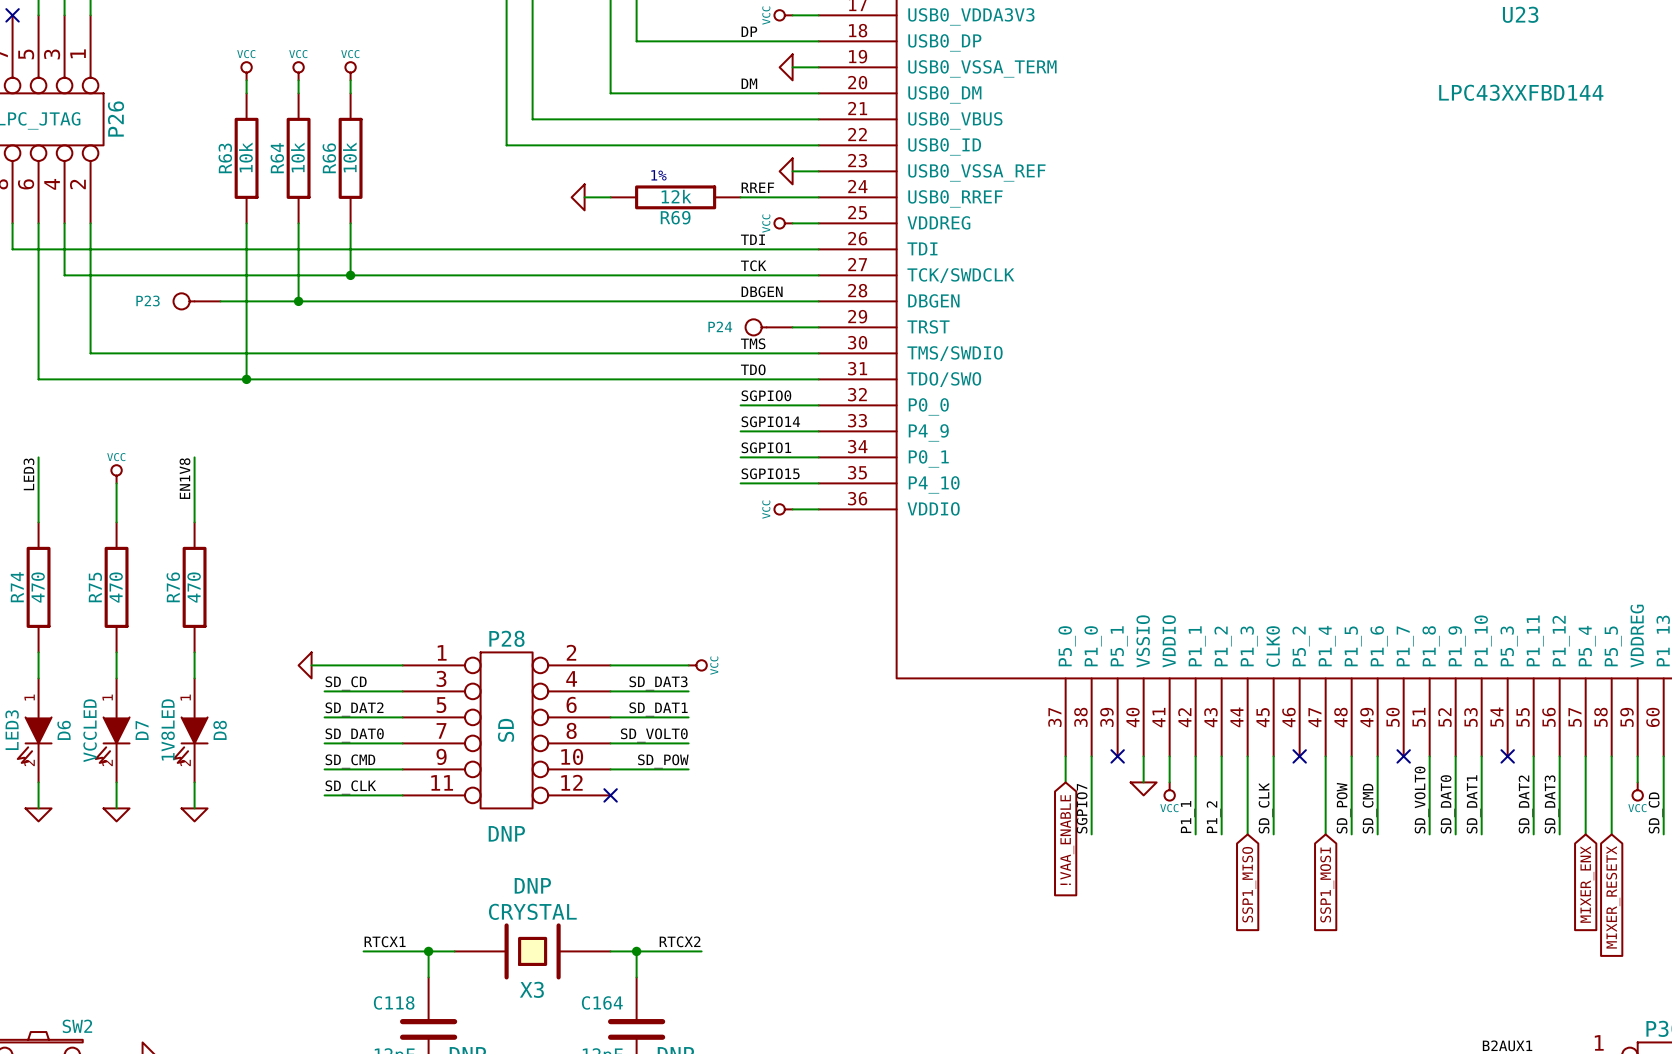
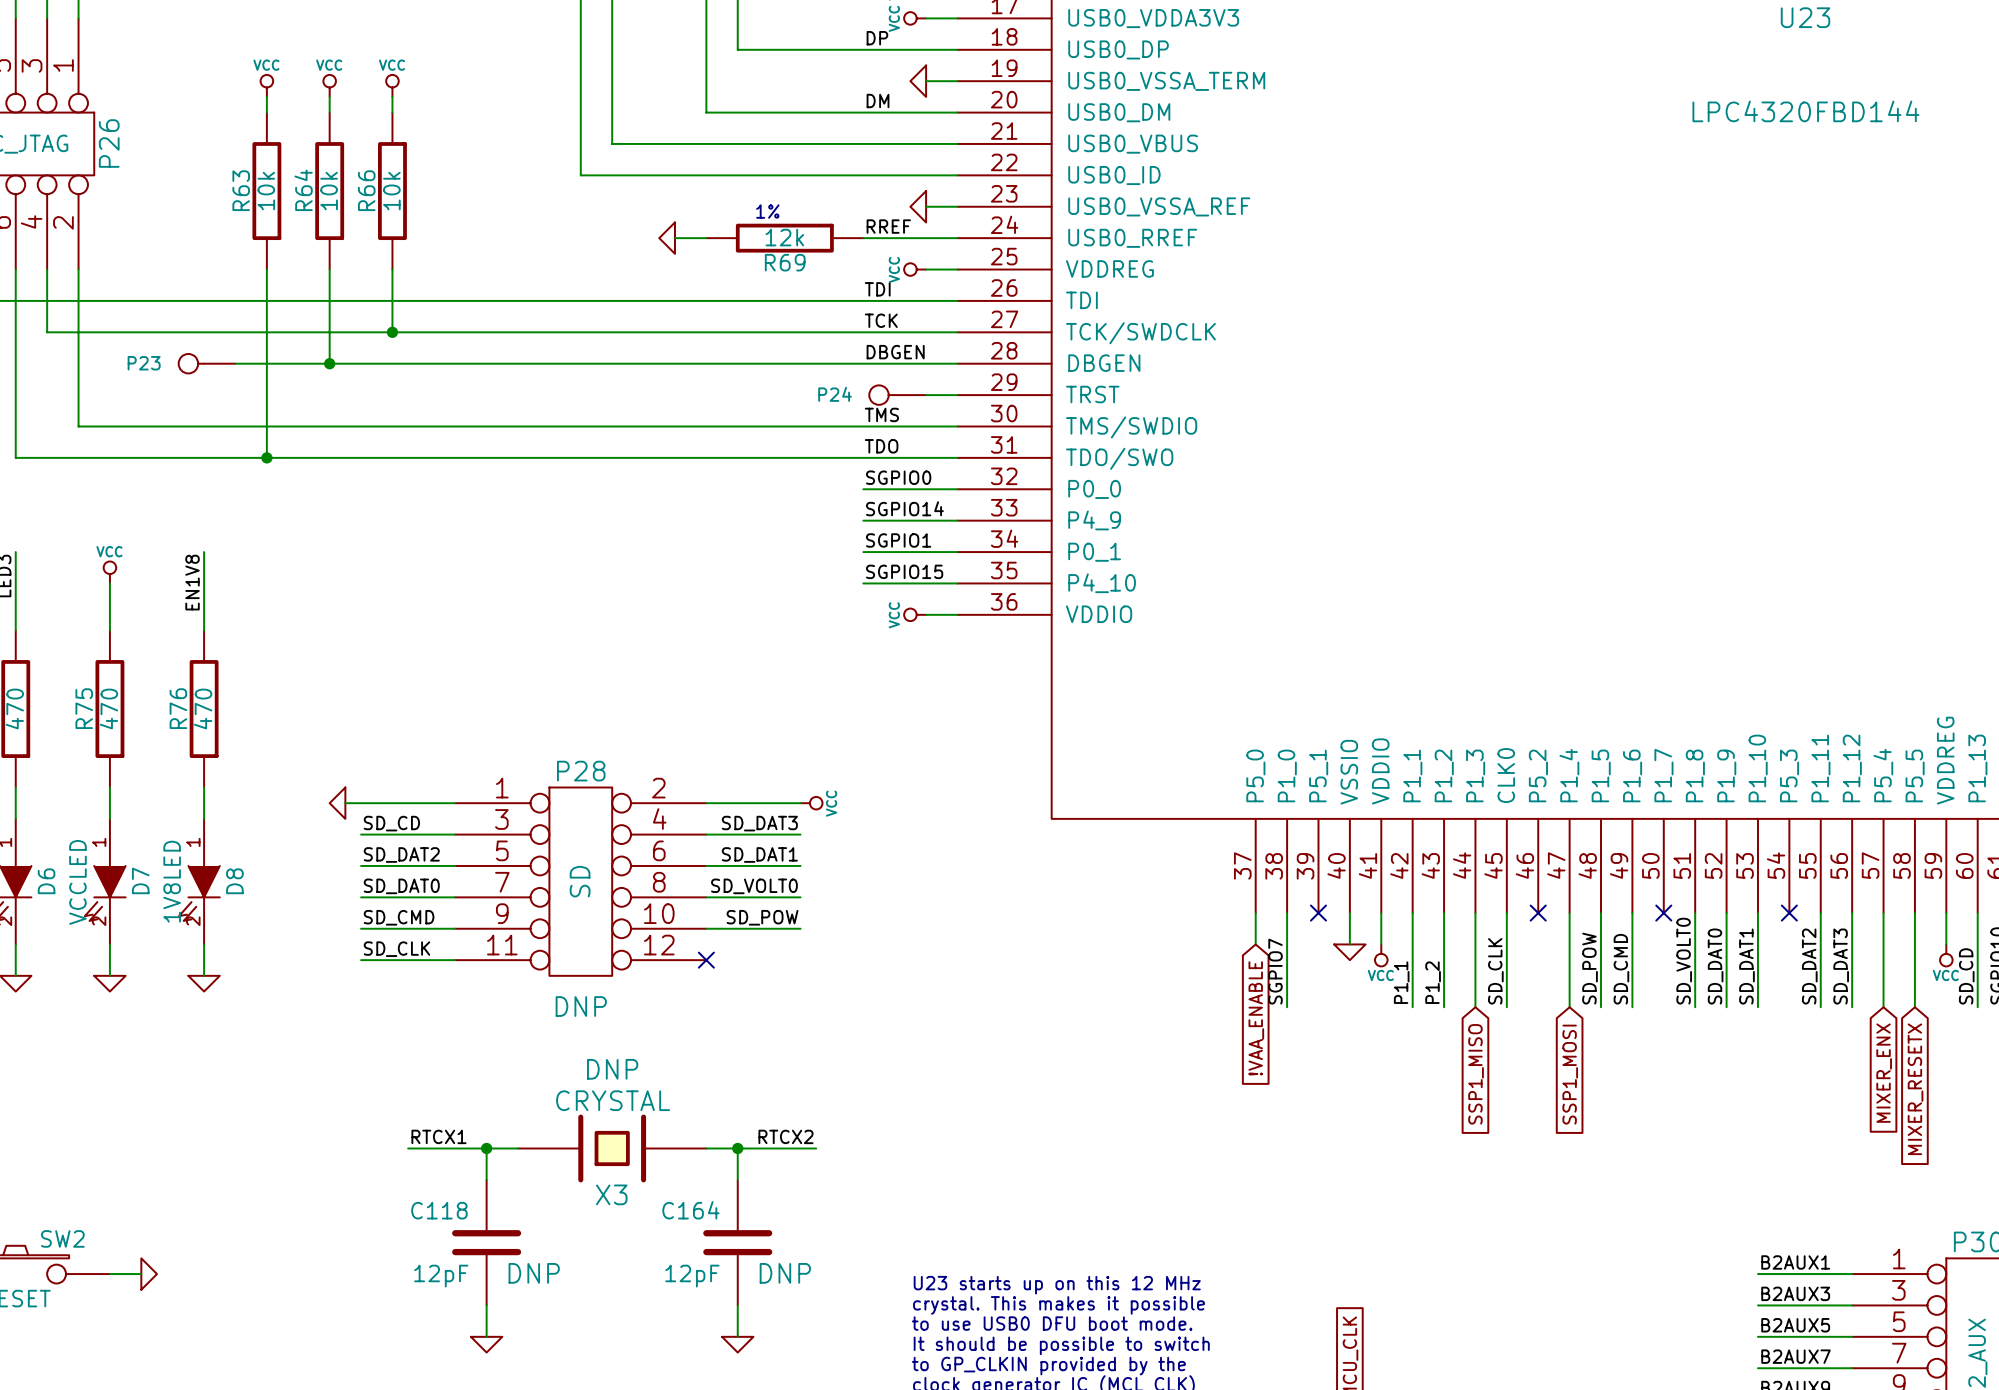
U23 value: LPC43XXFBD144 (1521, 92) -> LPC4320FBD144 (1805, 111)

